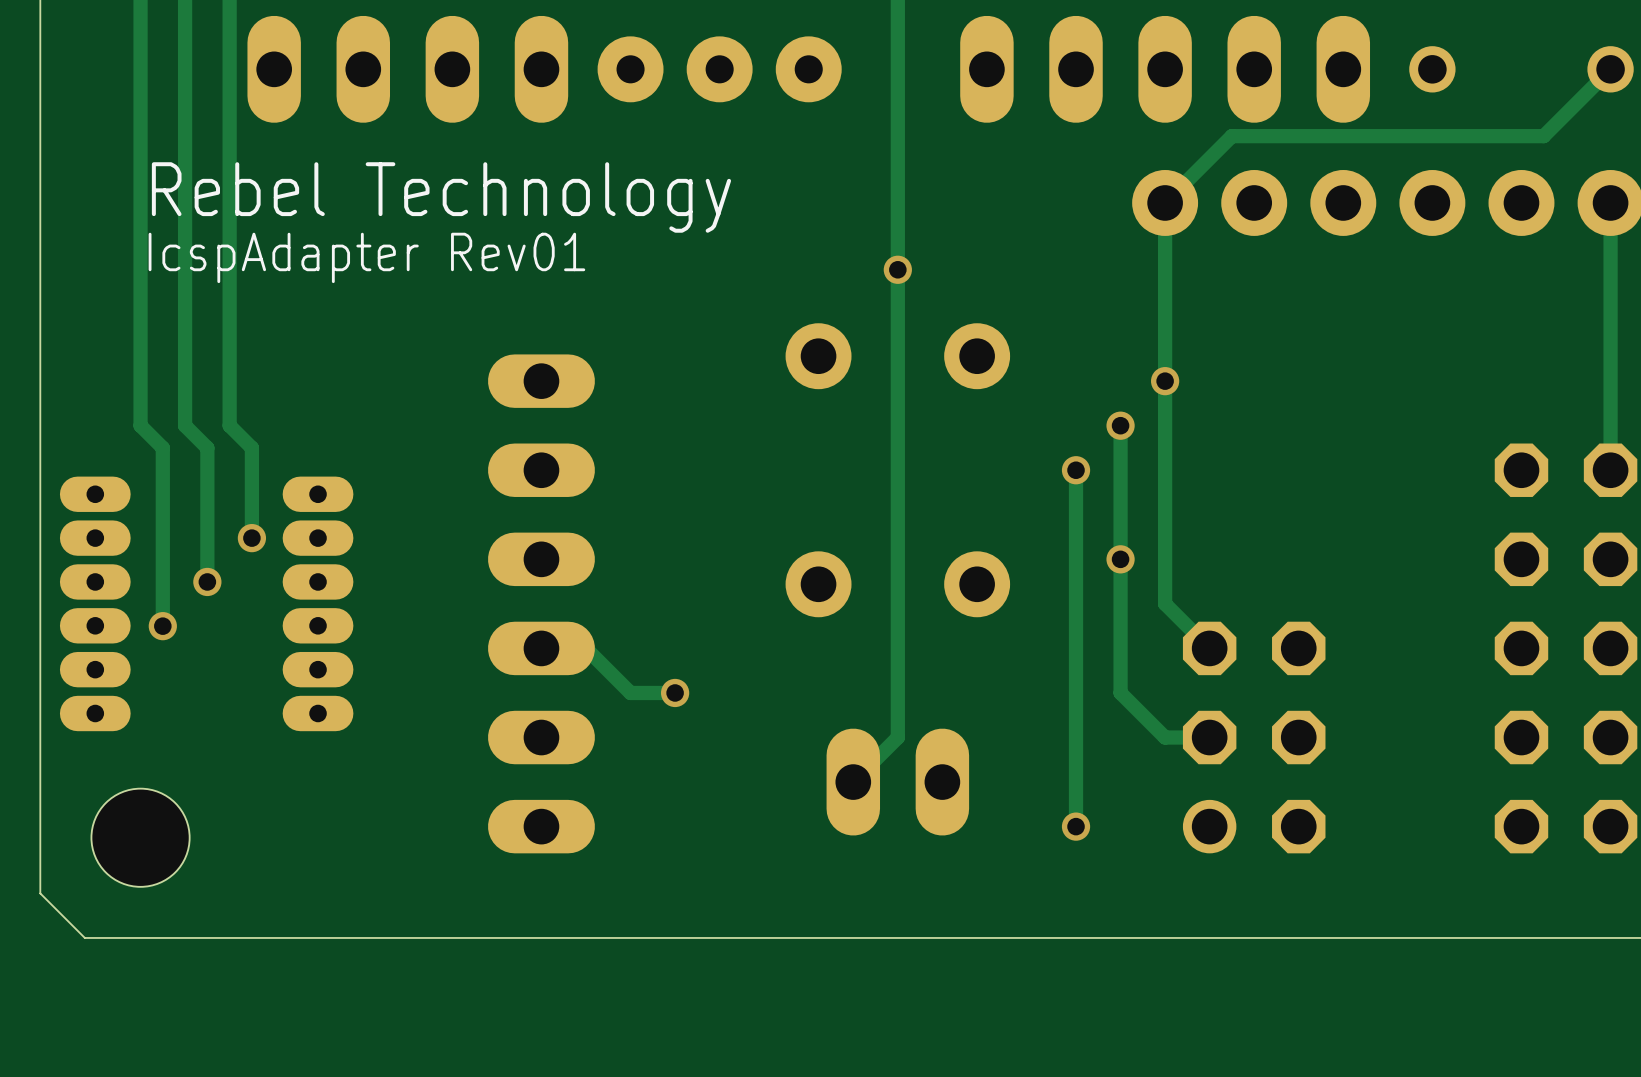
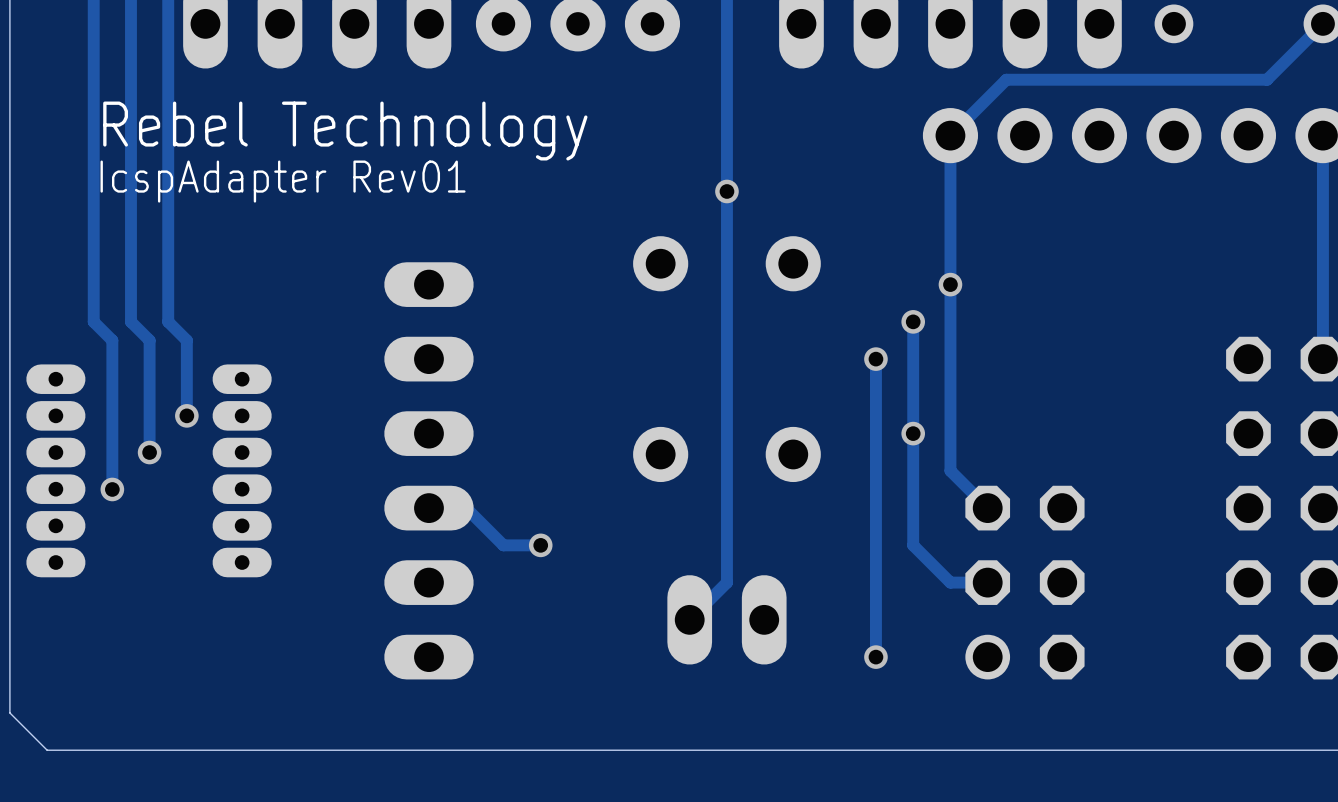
part: (140, 837) -> none

